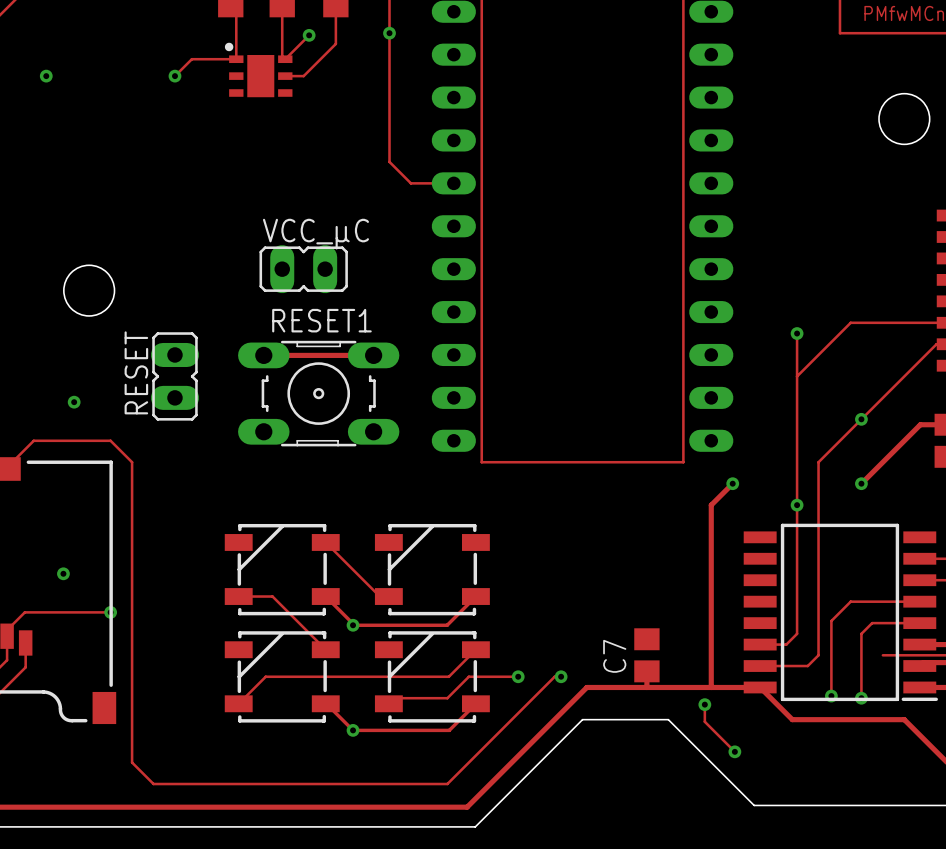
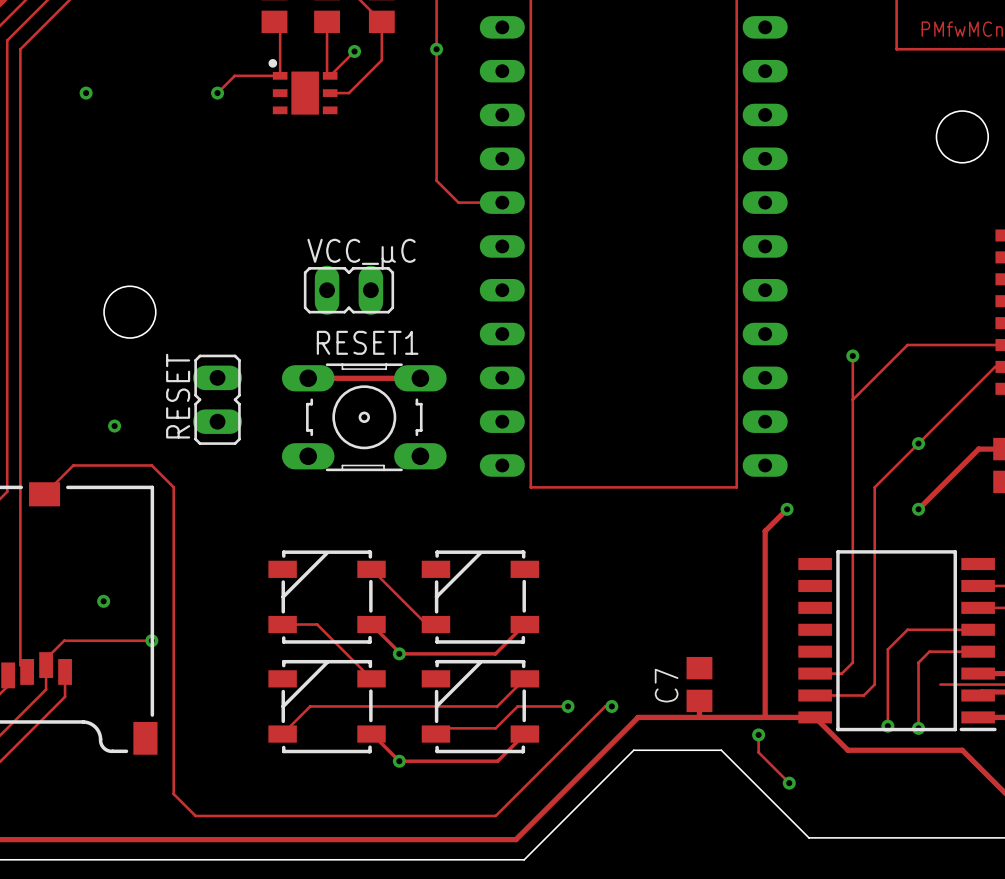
via: (797, 505) -> none

